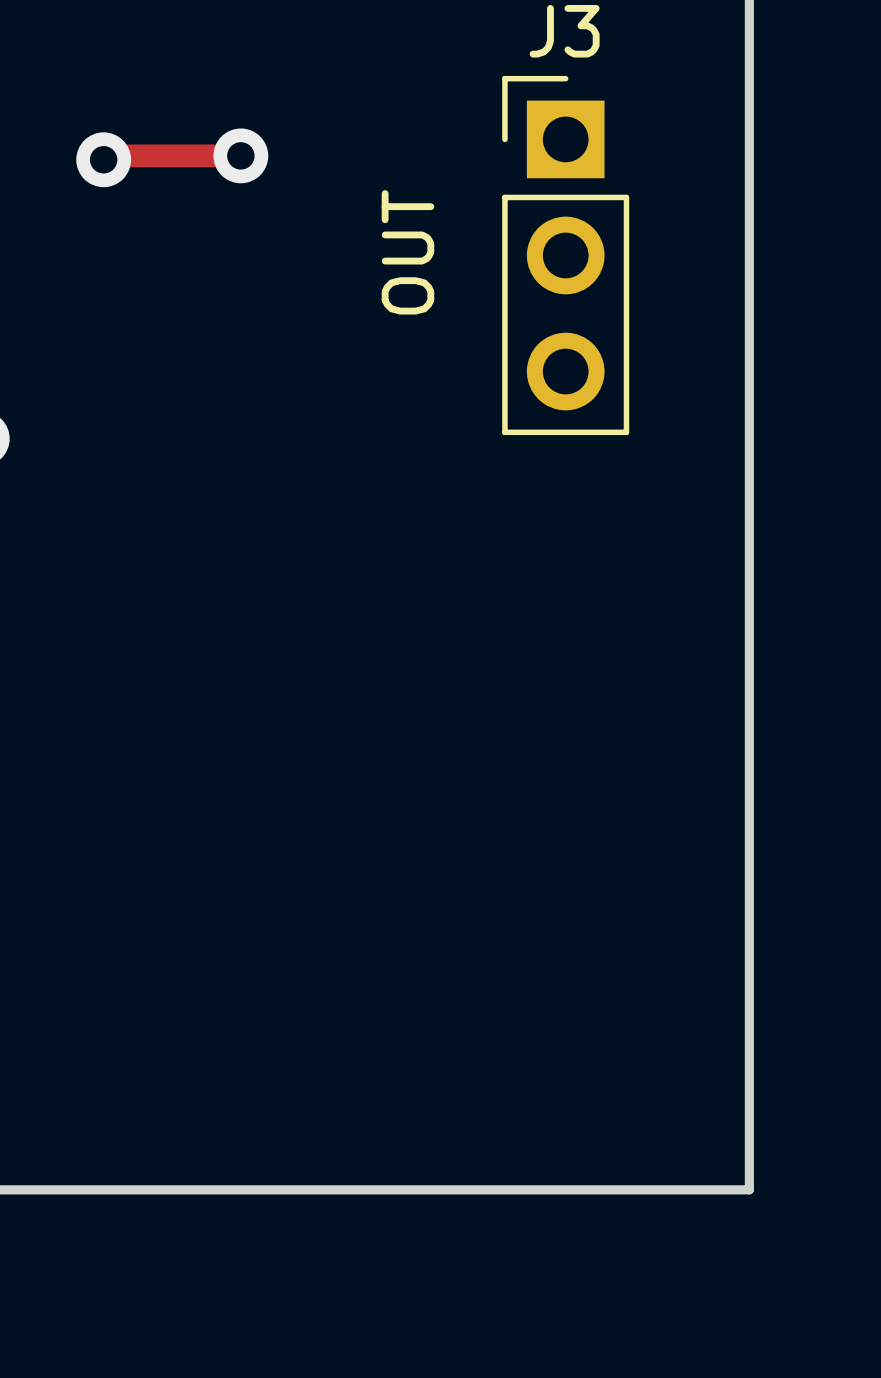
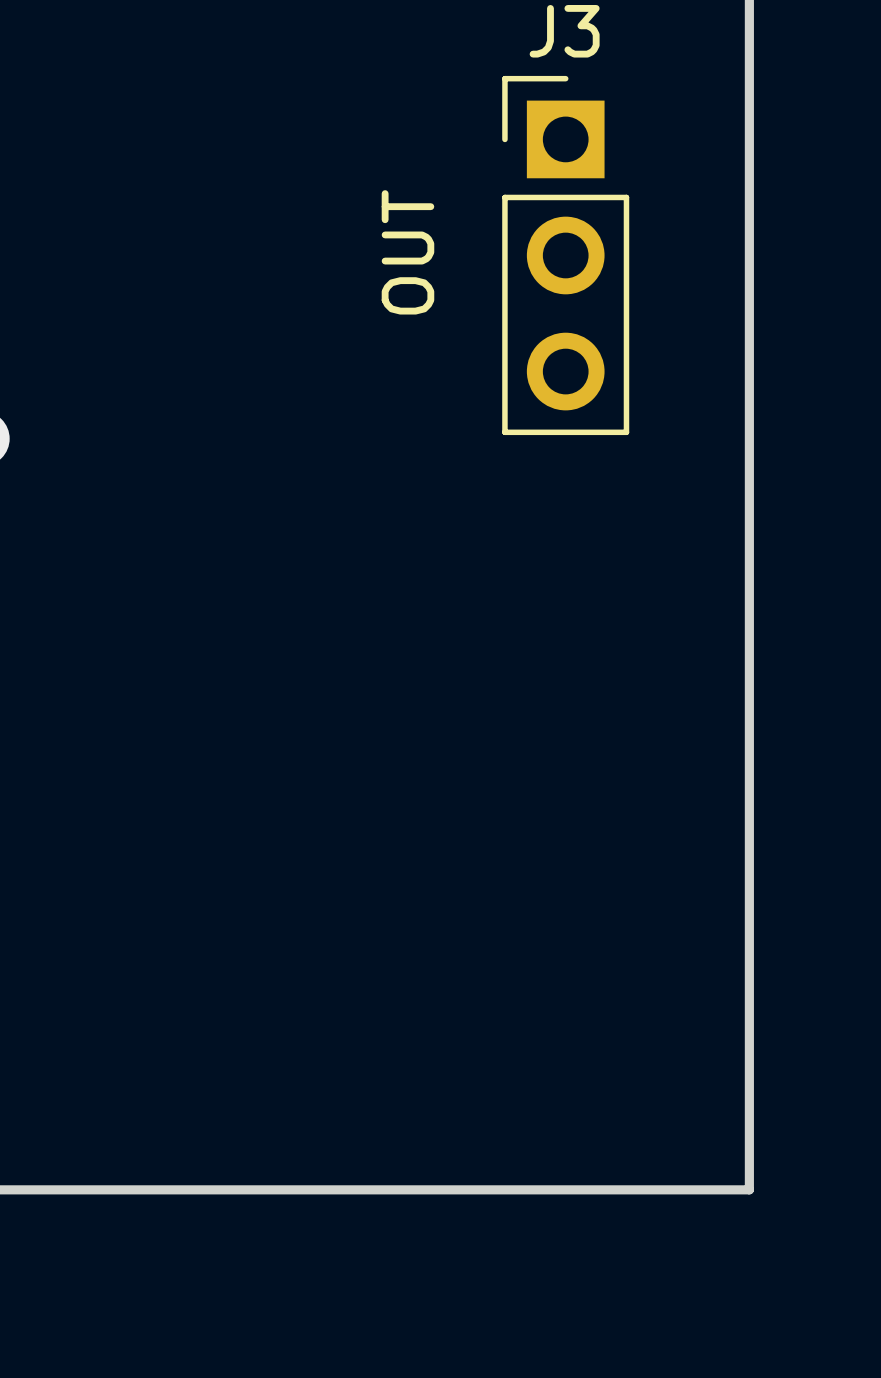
track: (240, 155) (107, 155) (103, 159) -> none
via: (240, 155) -> none
via: (103, 159) -> none

